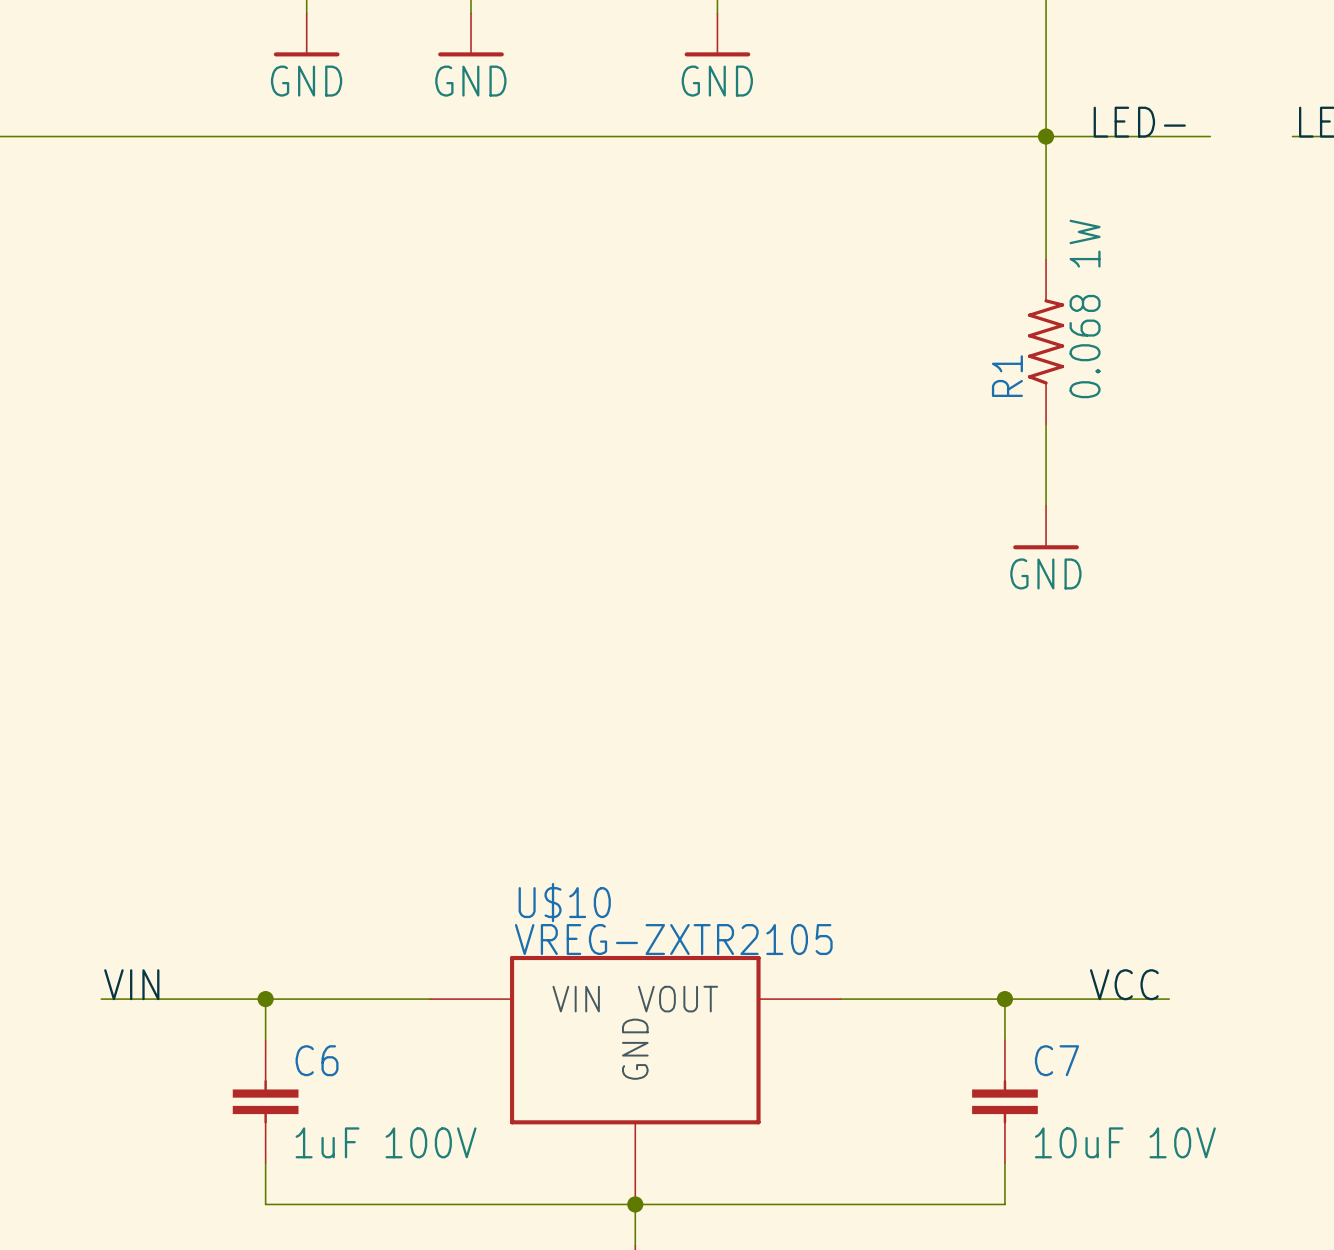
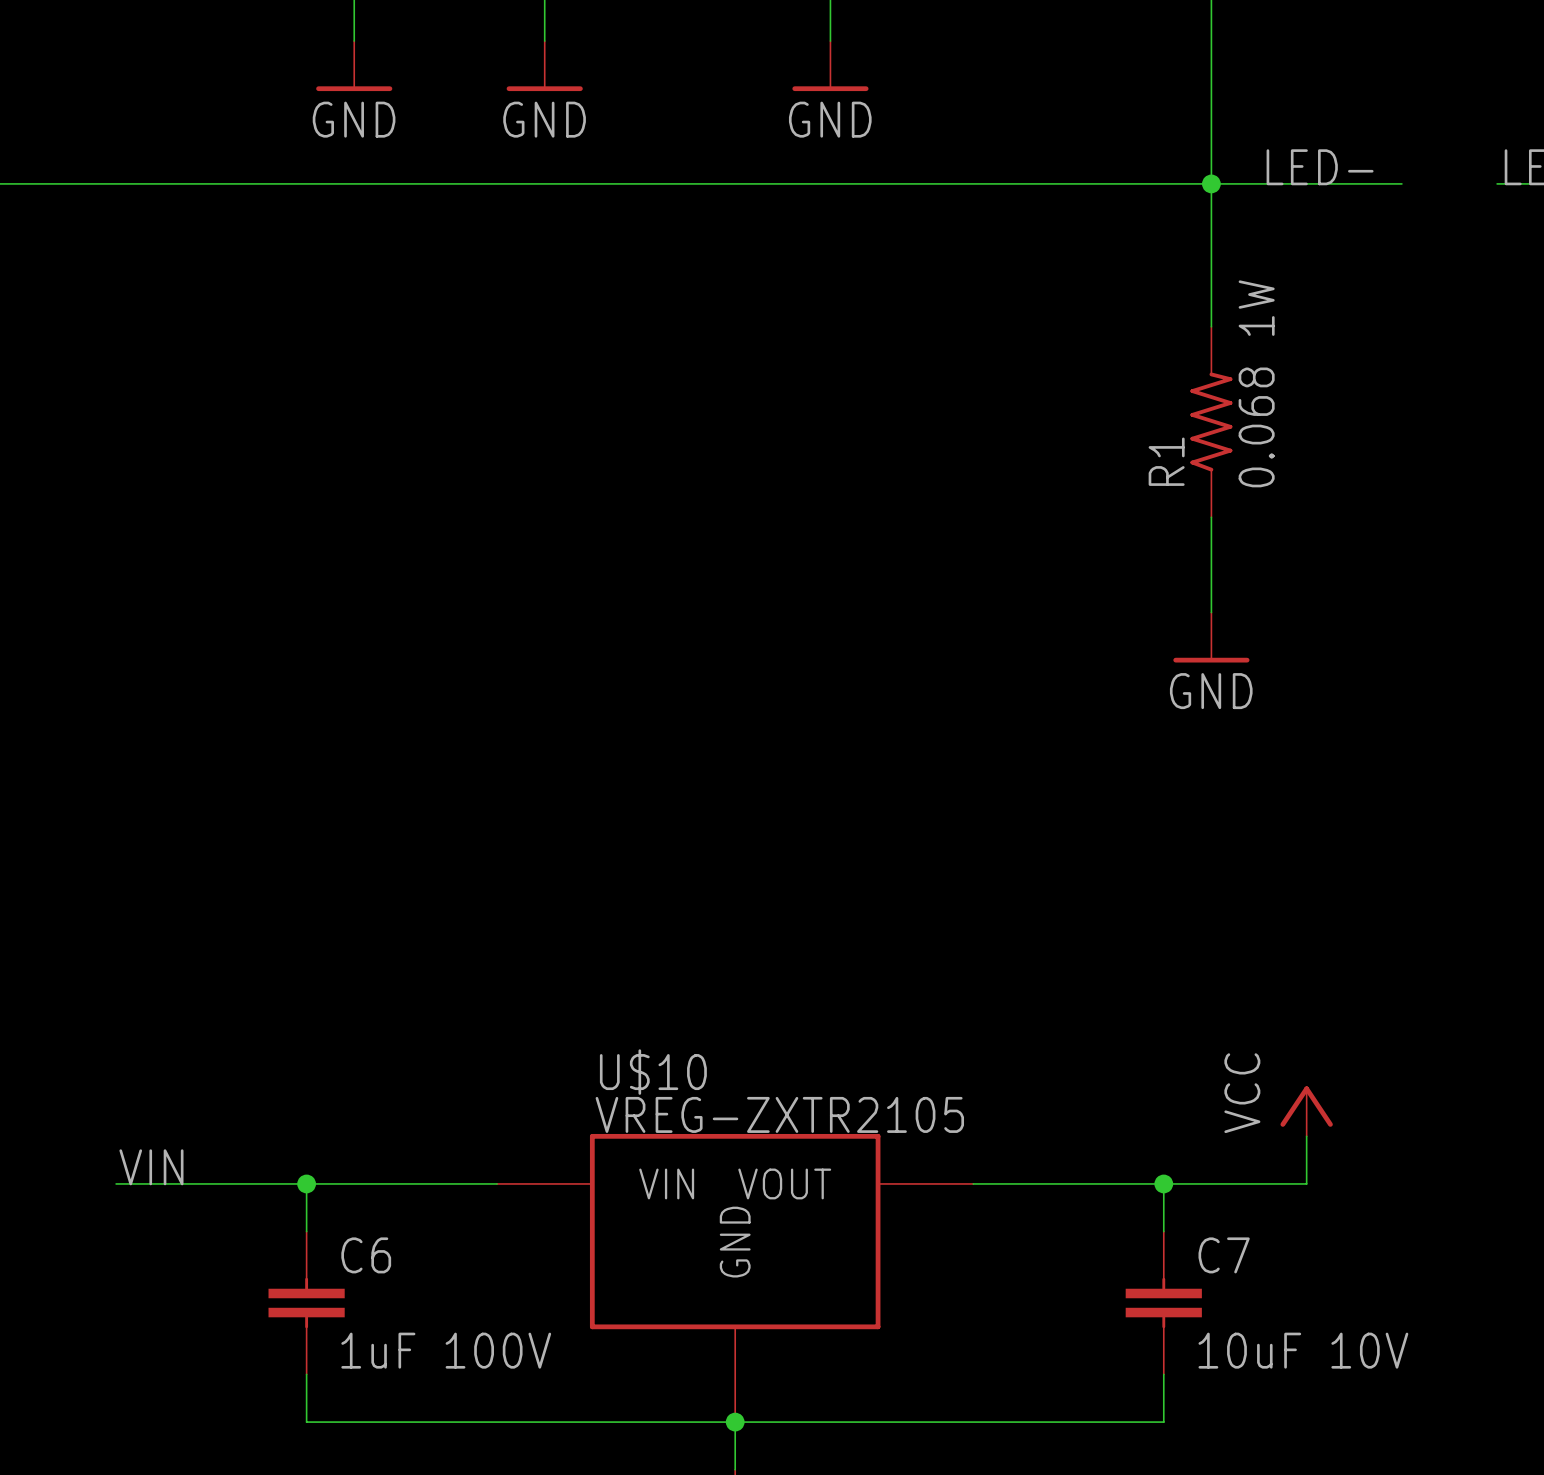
power symbol: none -> VCC (1306, 1111)
label: VCC (1124, 984) -> none
wire: (1128, 999) (1169, 999) -> (1306, 1183) (1306, 1136)

